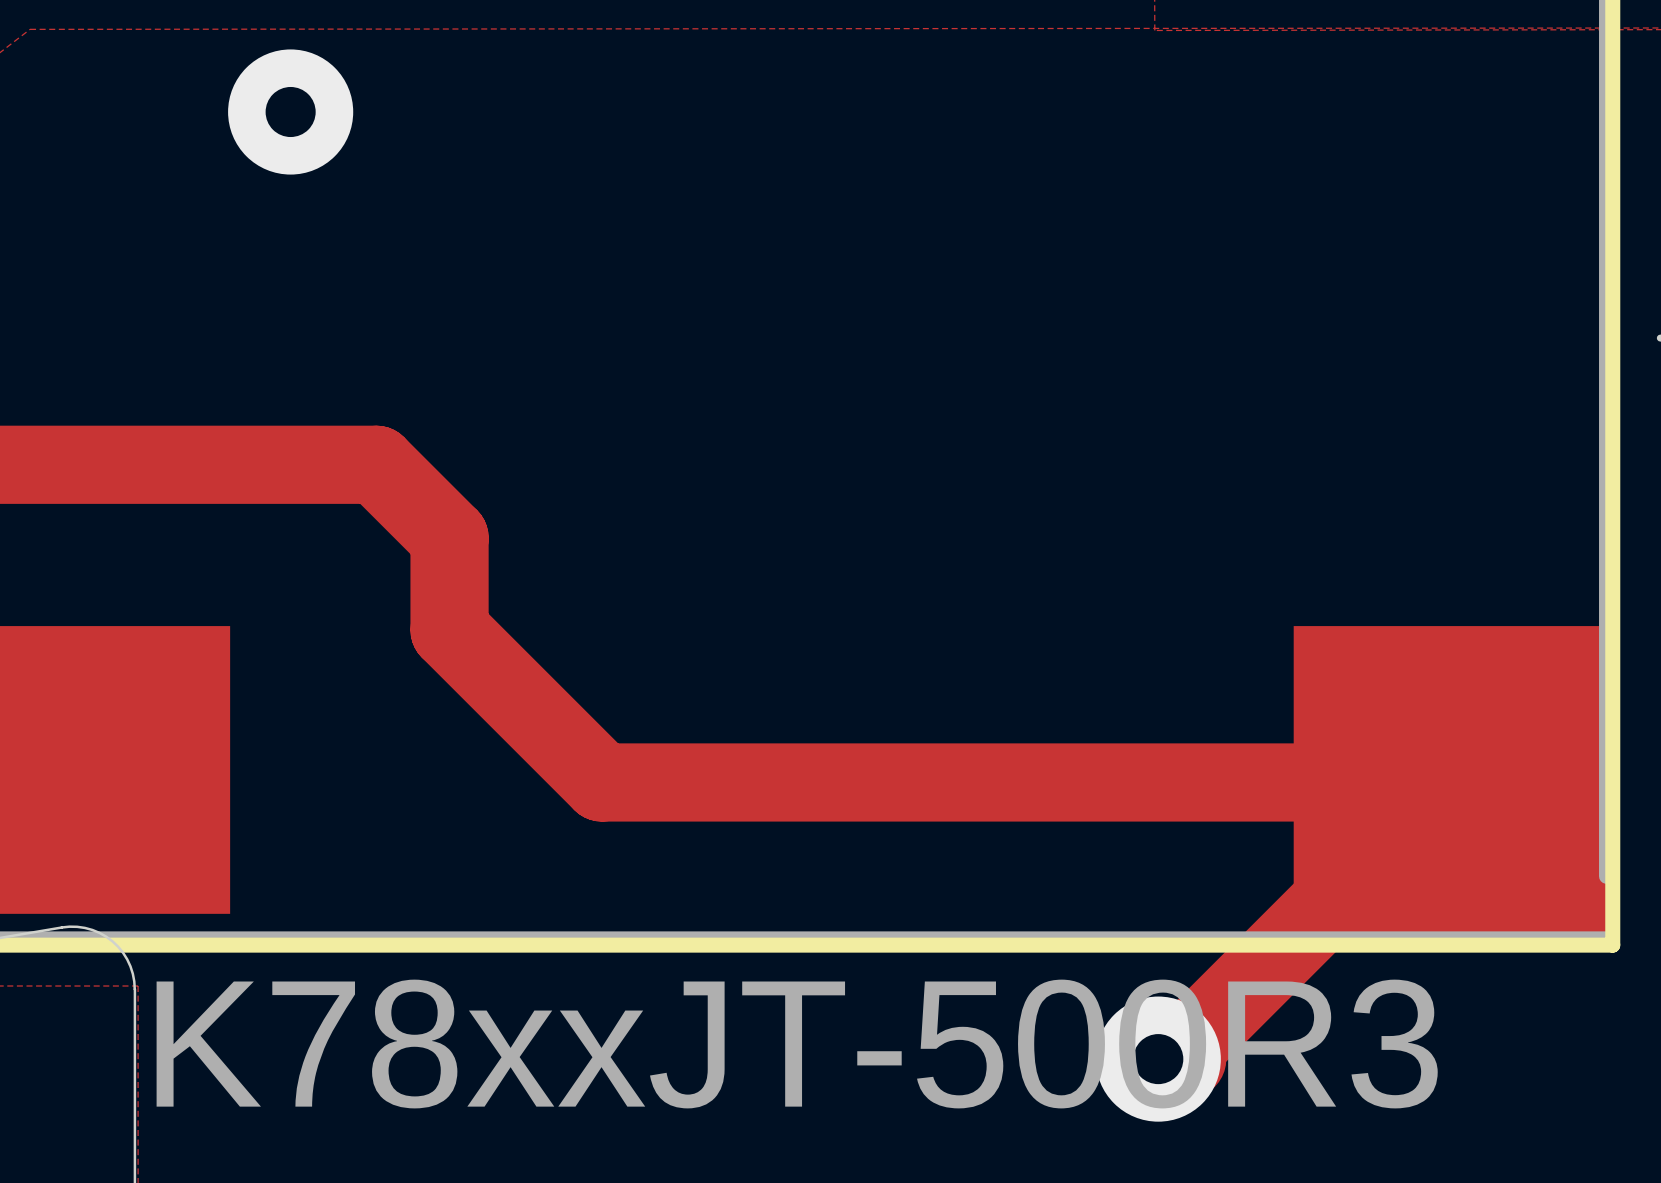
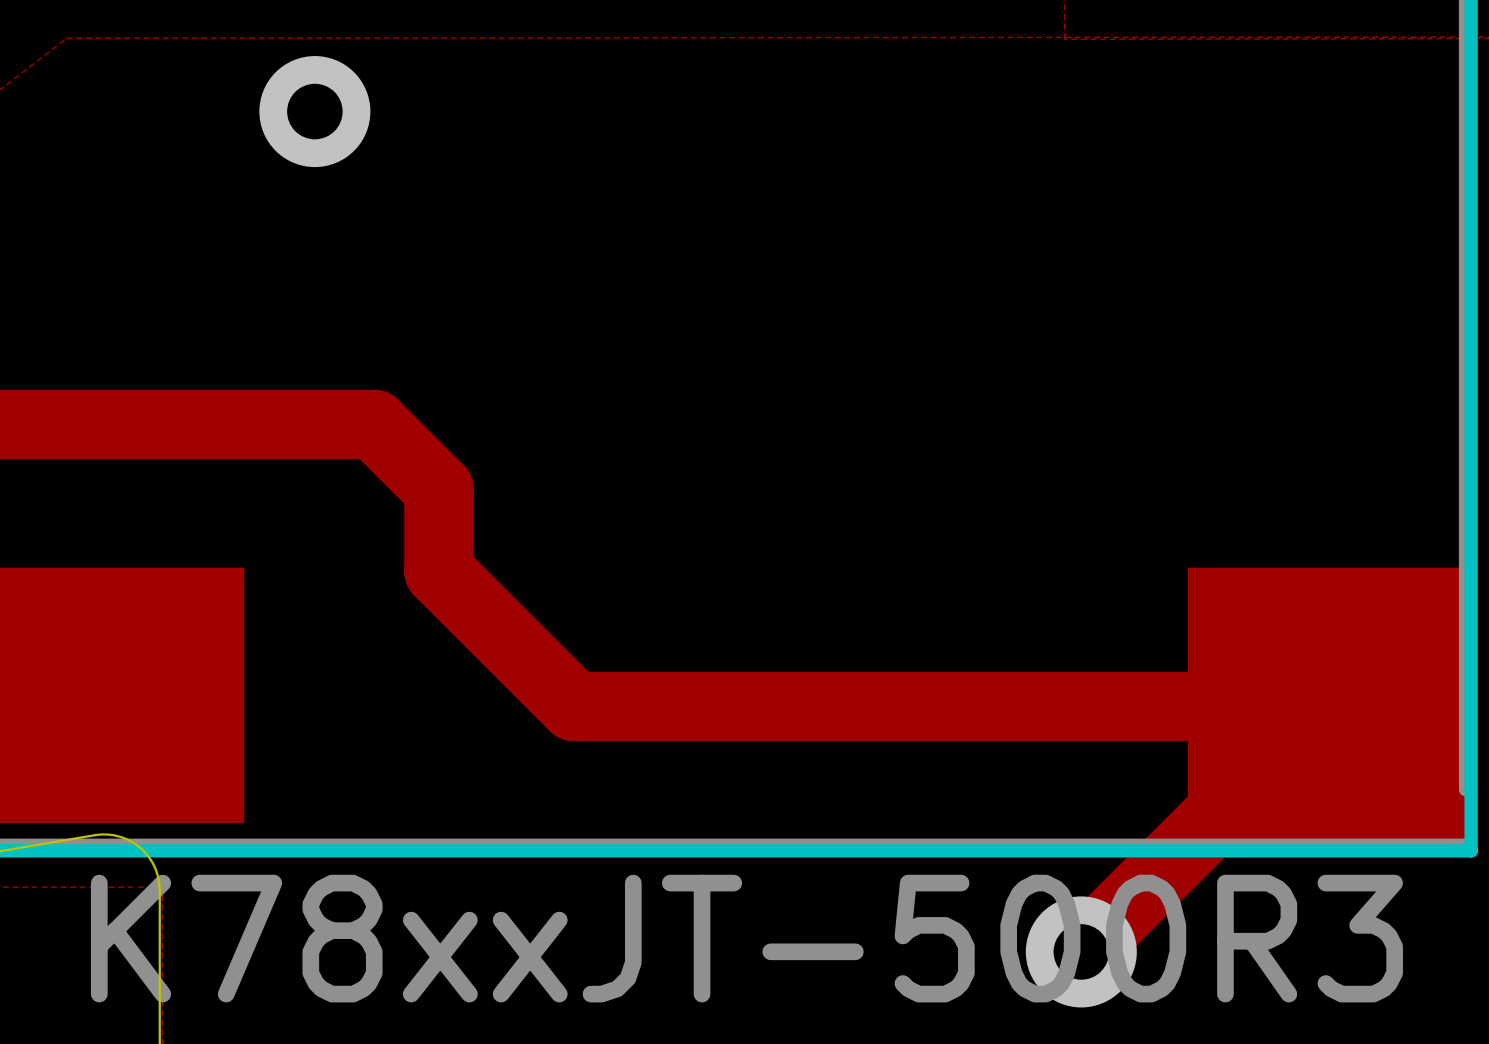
via position: (290, 112) -> (314, 111)
via position: (1158, 1059) -> (1081, 951)

